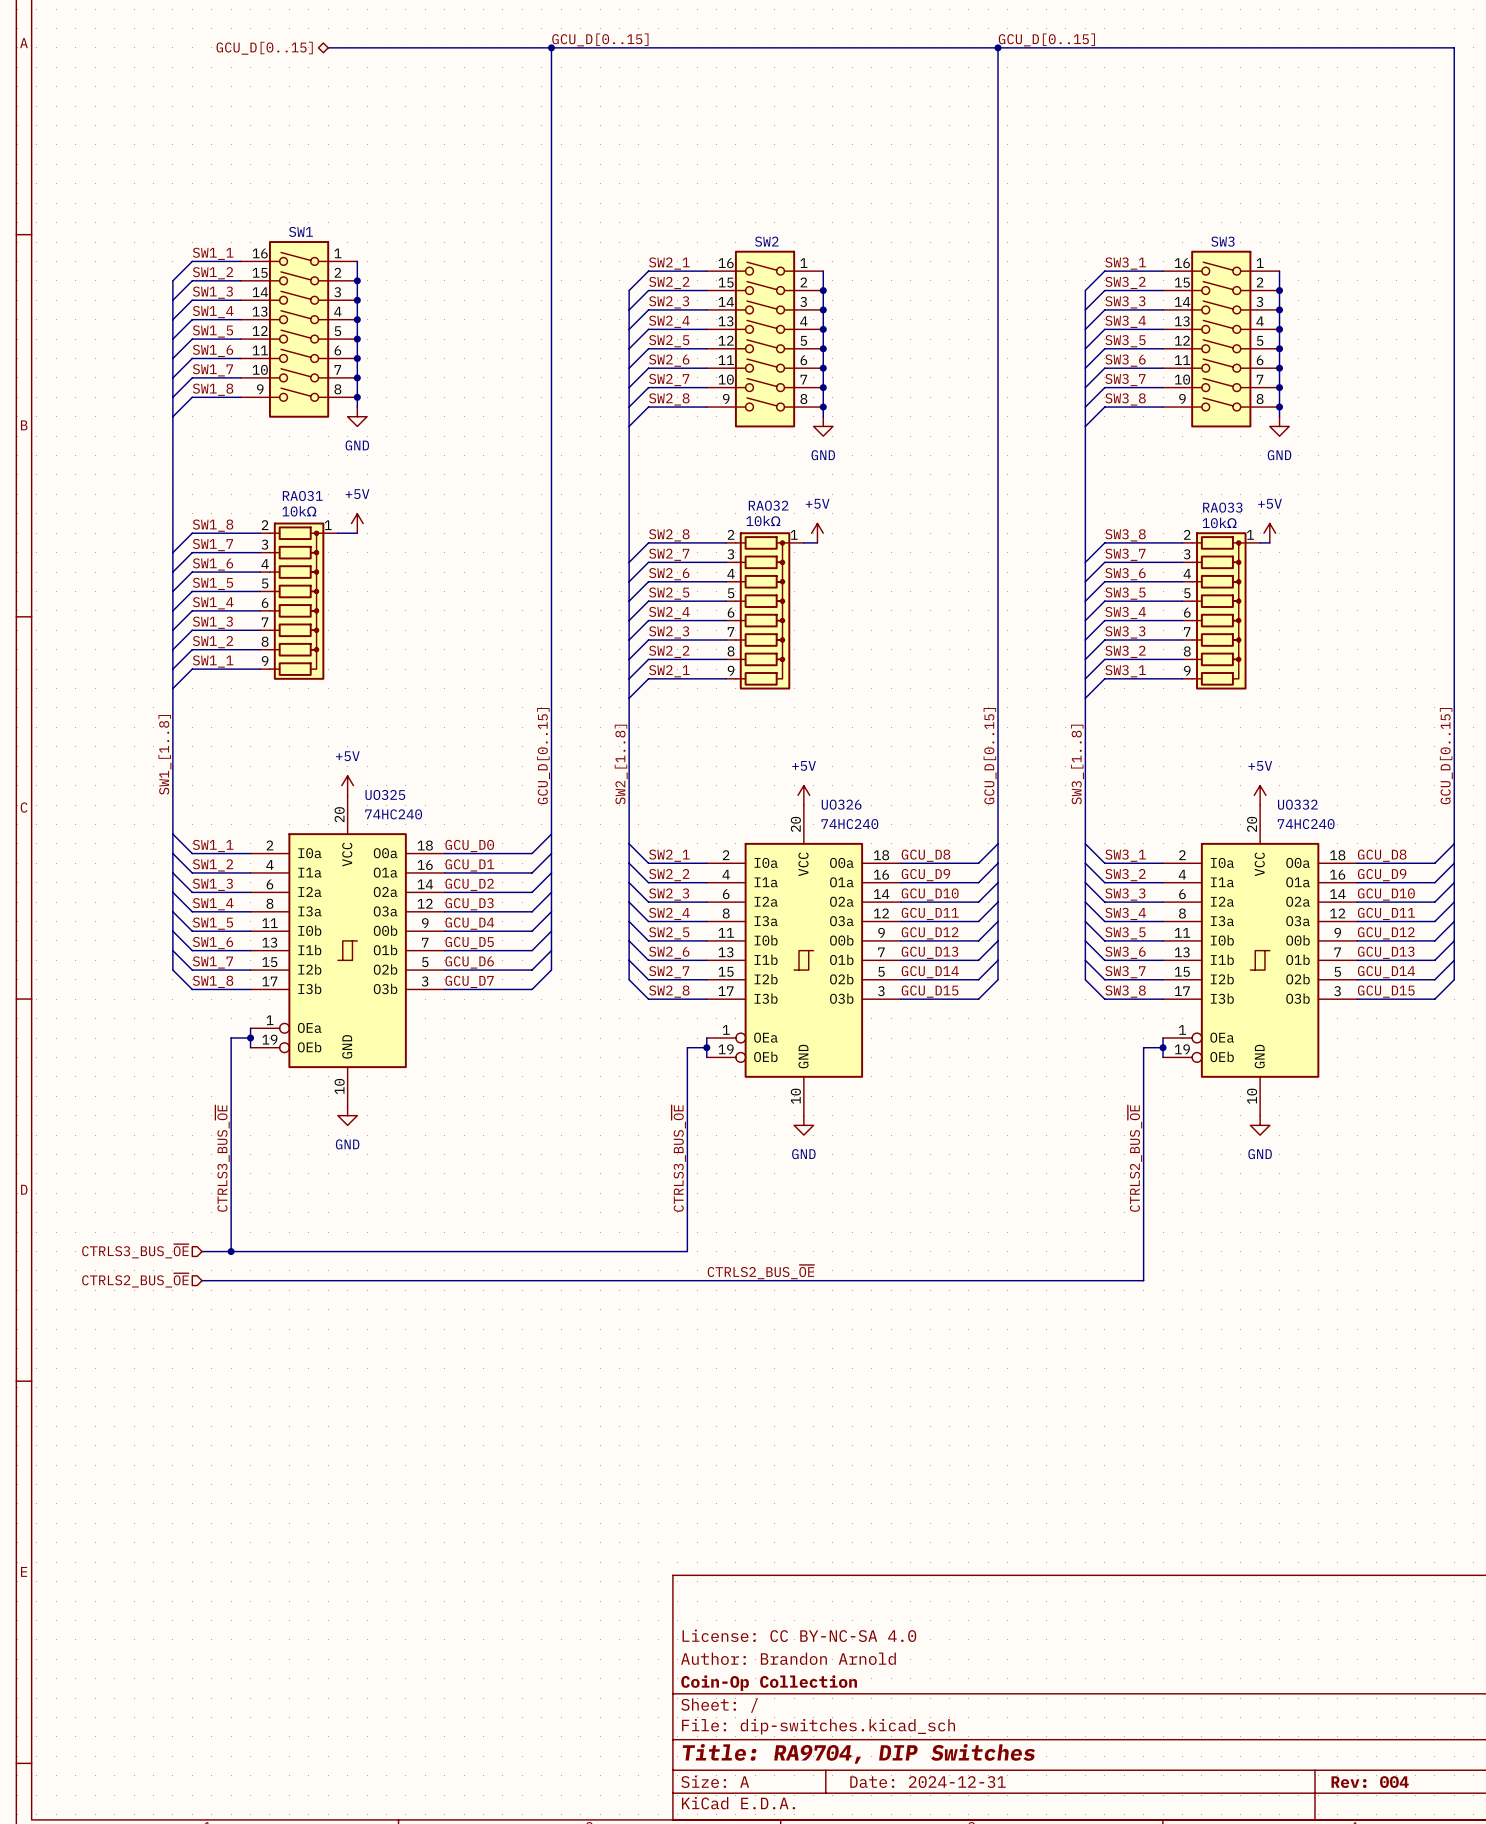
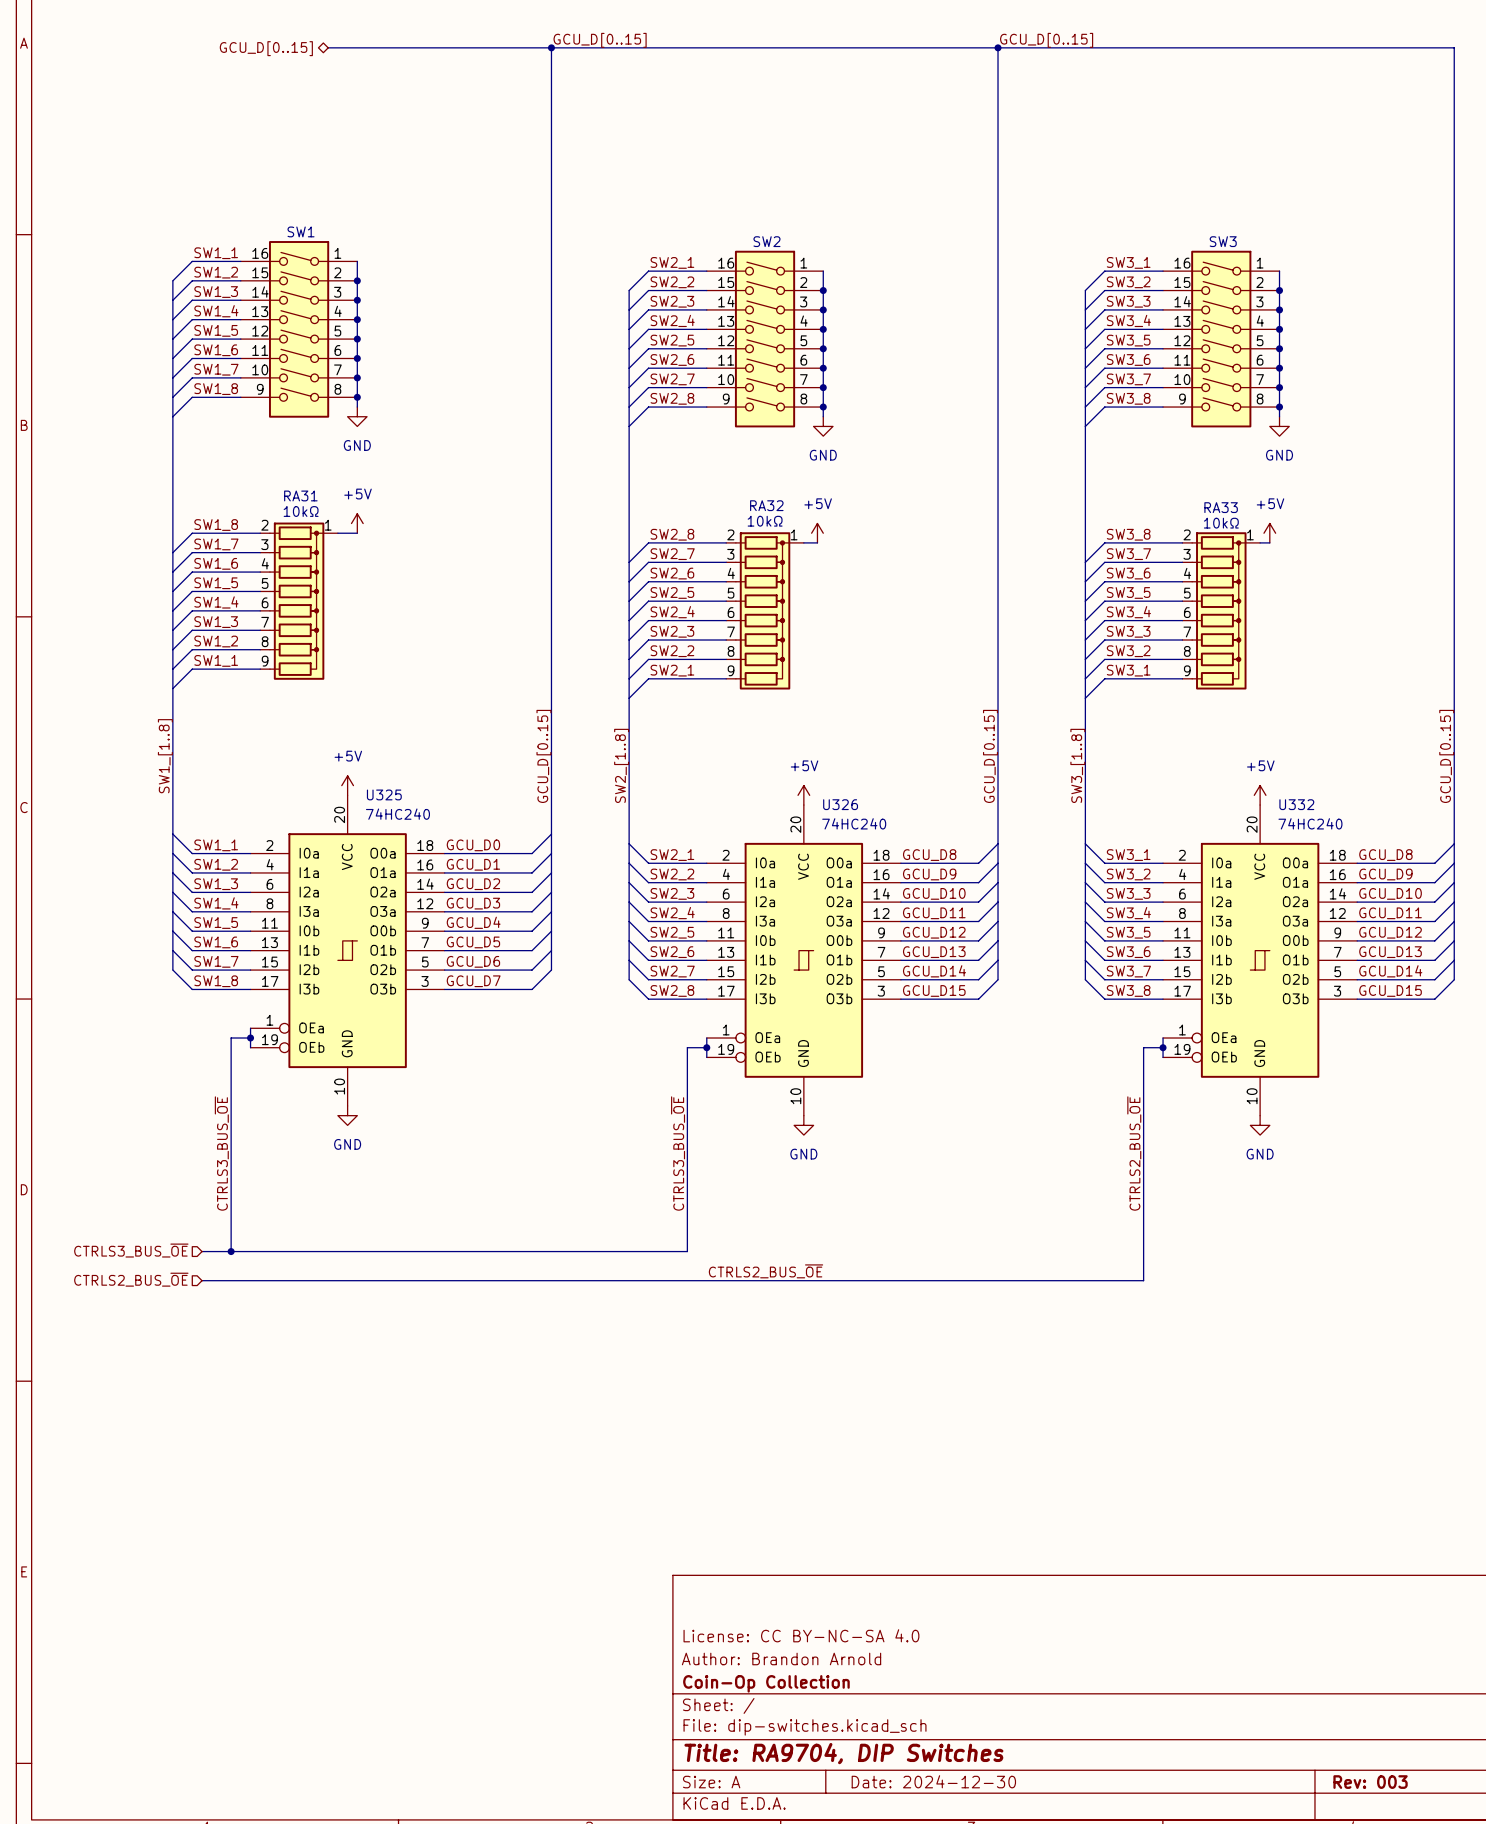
RAO31 name: RAO31 (302, 495) -> RA31 (300, 495)
RAO32 name: RAO32 (768, 505) -> RA32 (766, 505)
RAO33 name: RAO33 (1222, 507) -> RA33 (1221, 507)
UO325 name: UO325 (385, 794) -> U325 (384, 794)
UO326 name: UO326 (841, 804) -> U326 (840, 804)
UO332 name: UO332 (1297, 804) -> U332 (1296, 804)
title block: Date: 2024-12-31 (927, 1782) -> Date: 2024-12-30 (933, 1781)
title block: Rev: 004 (1370, 1782) -> Rev: 003 (1370, 1782)

